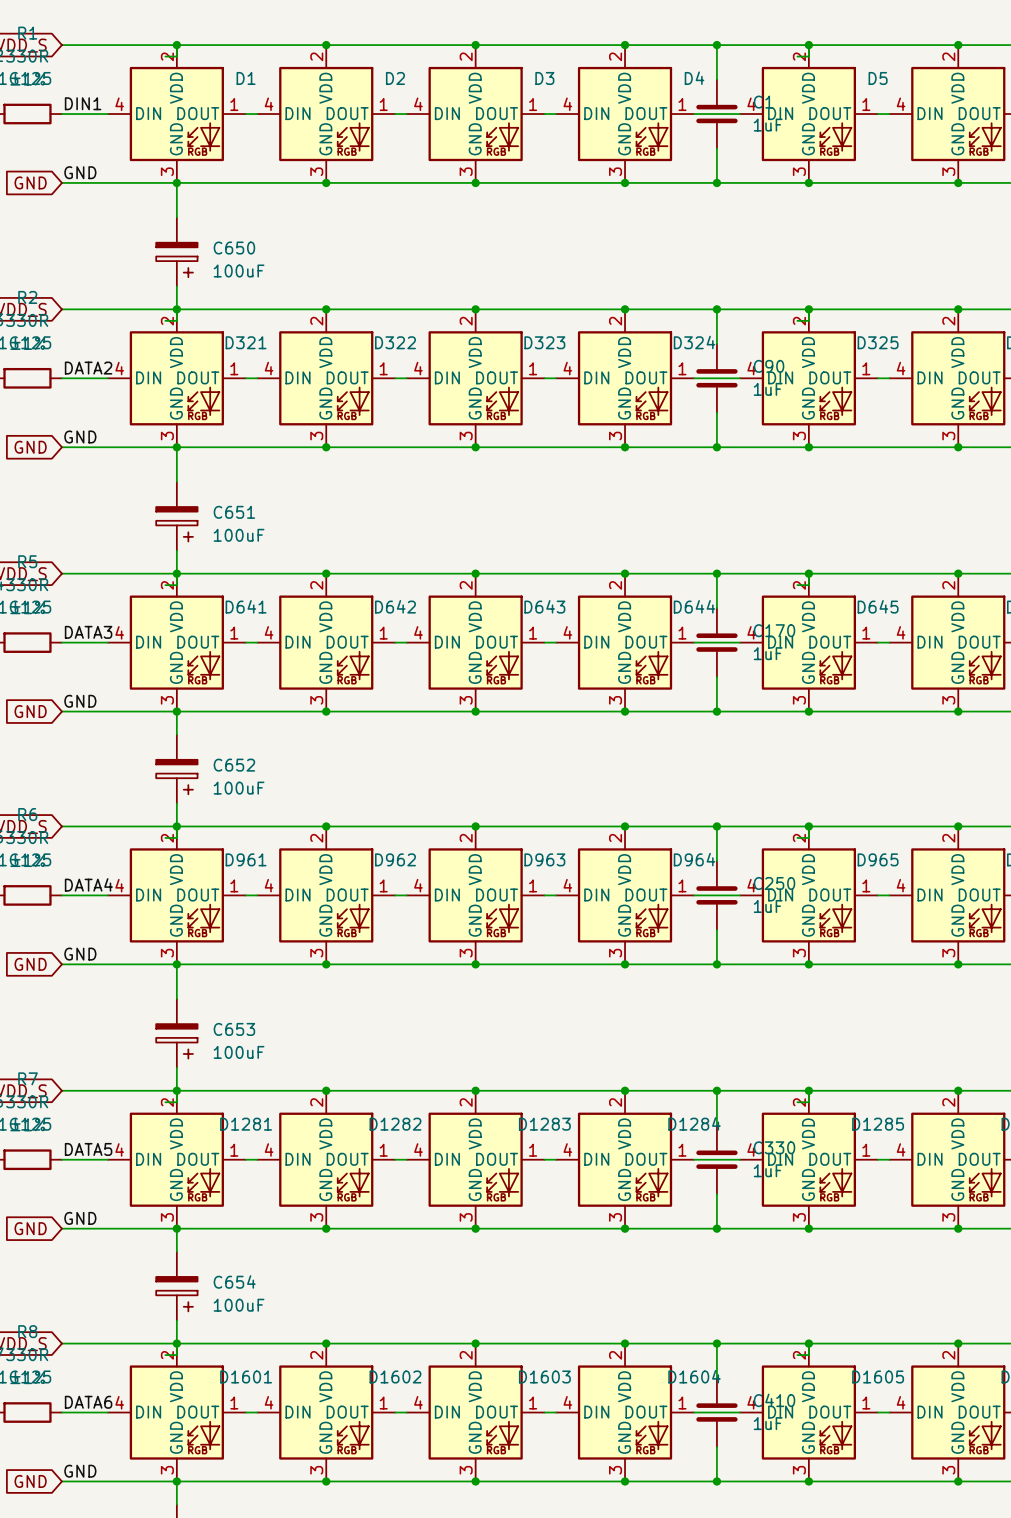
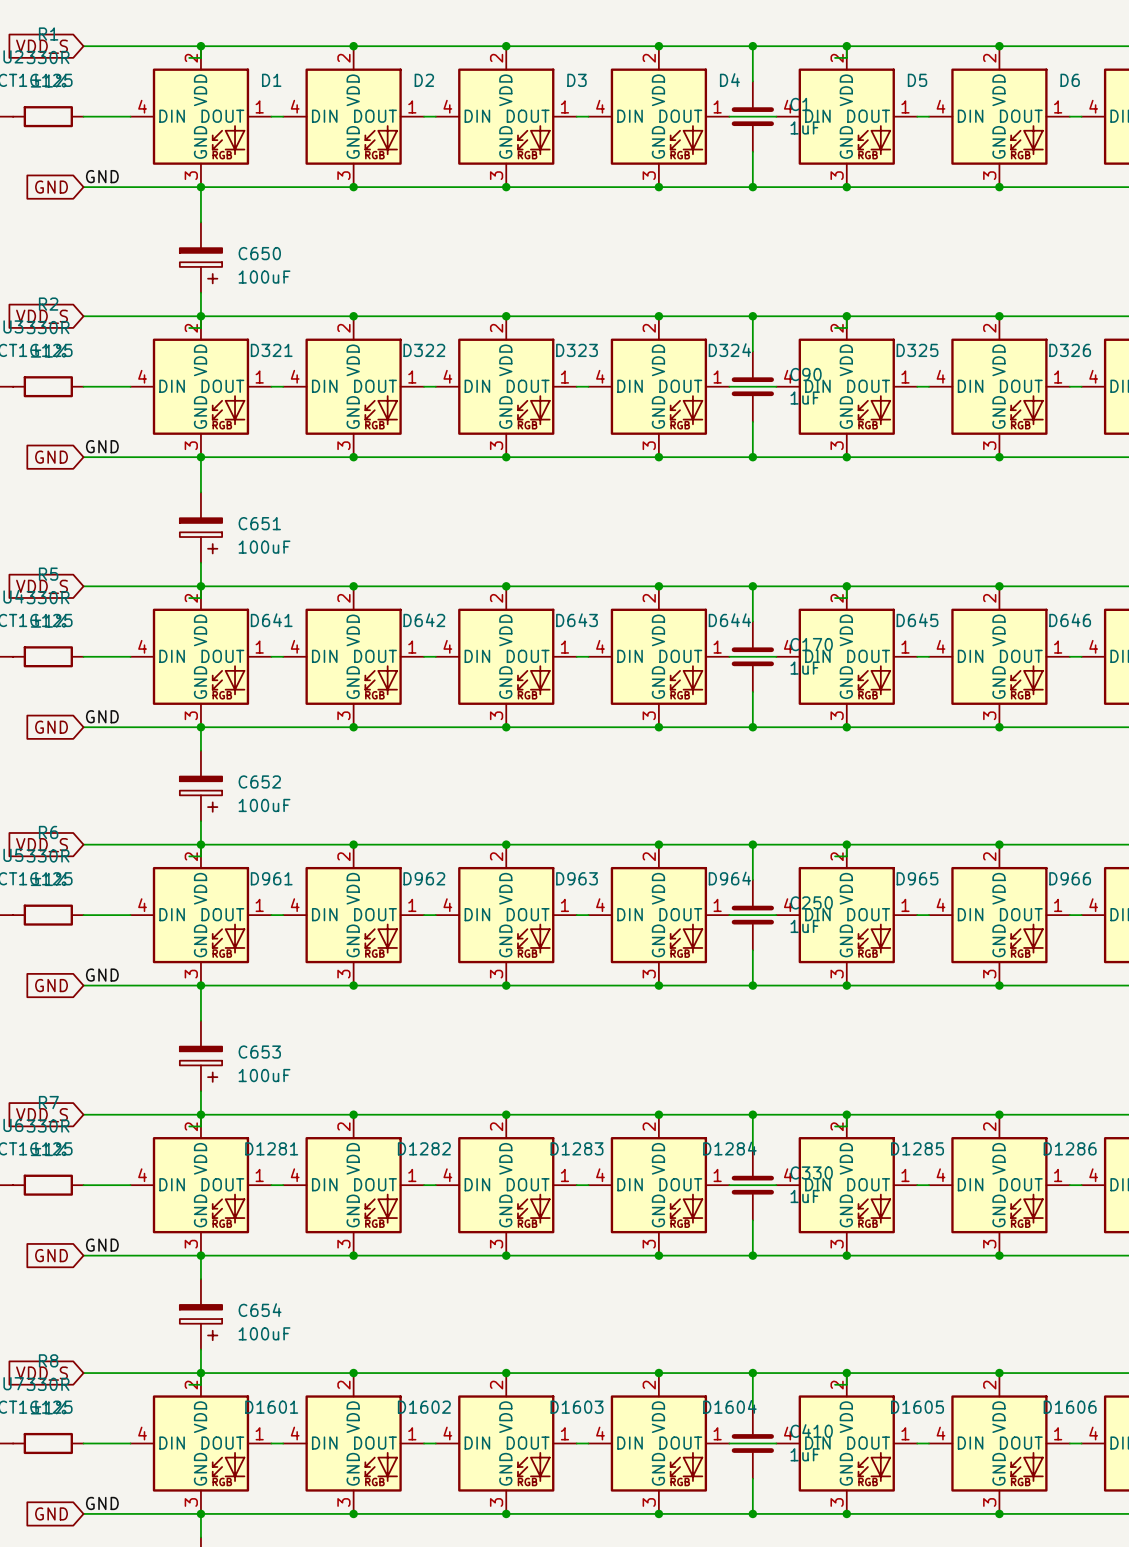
label: DIN1 (83, 103) -> none
label: DATA2 (88, 368) -> none
label: DATA3 (88, 632) -> none
label: DATA4 (88, 884) -> none
label: DATA5 (88, 1149) -> none
label: DATA6 (88, 1402) -> none

